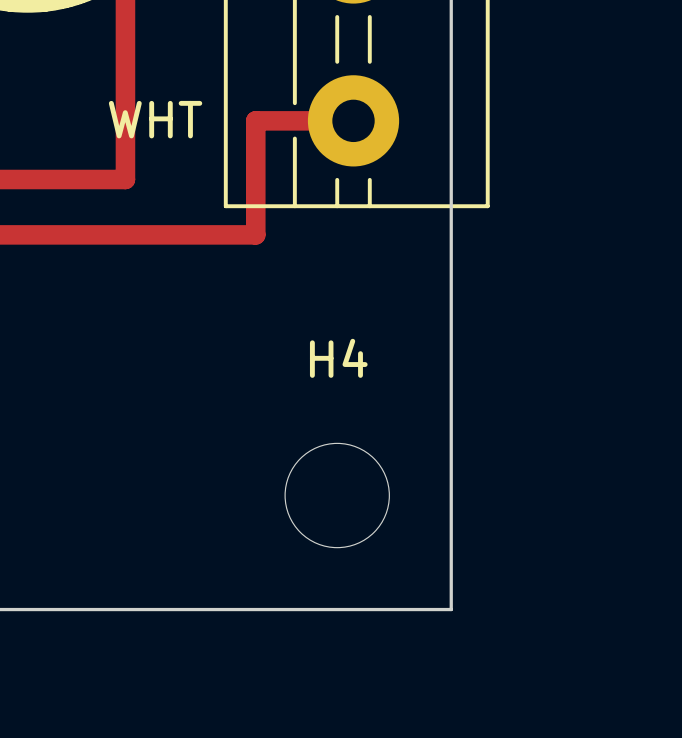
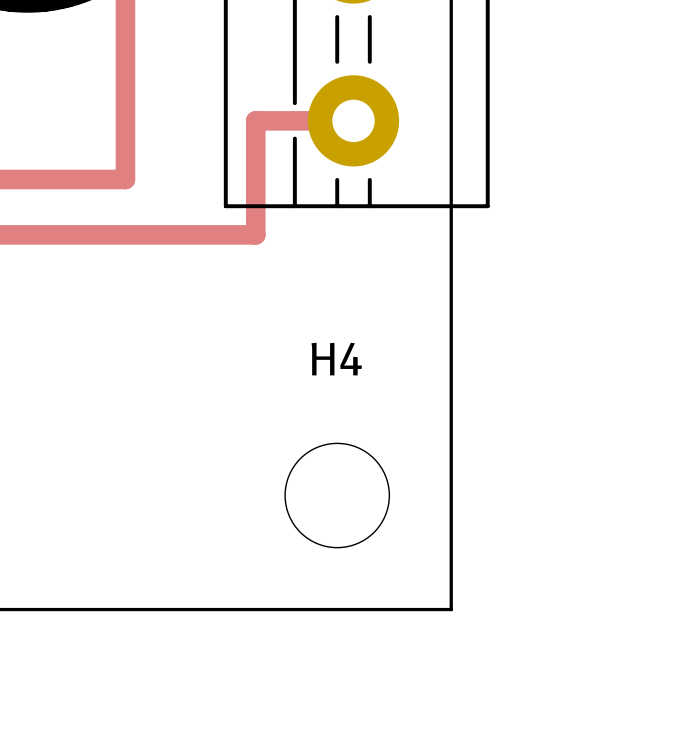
text: WHT (155, 119) -> none

